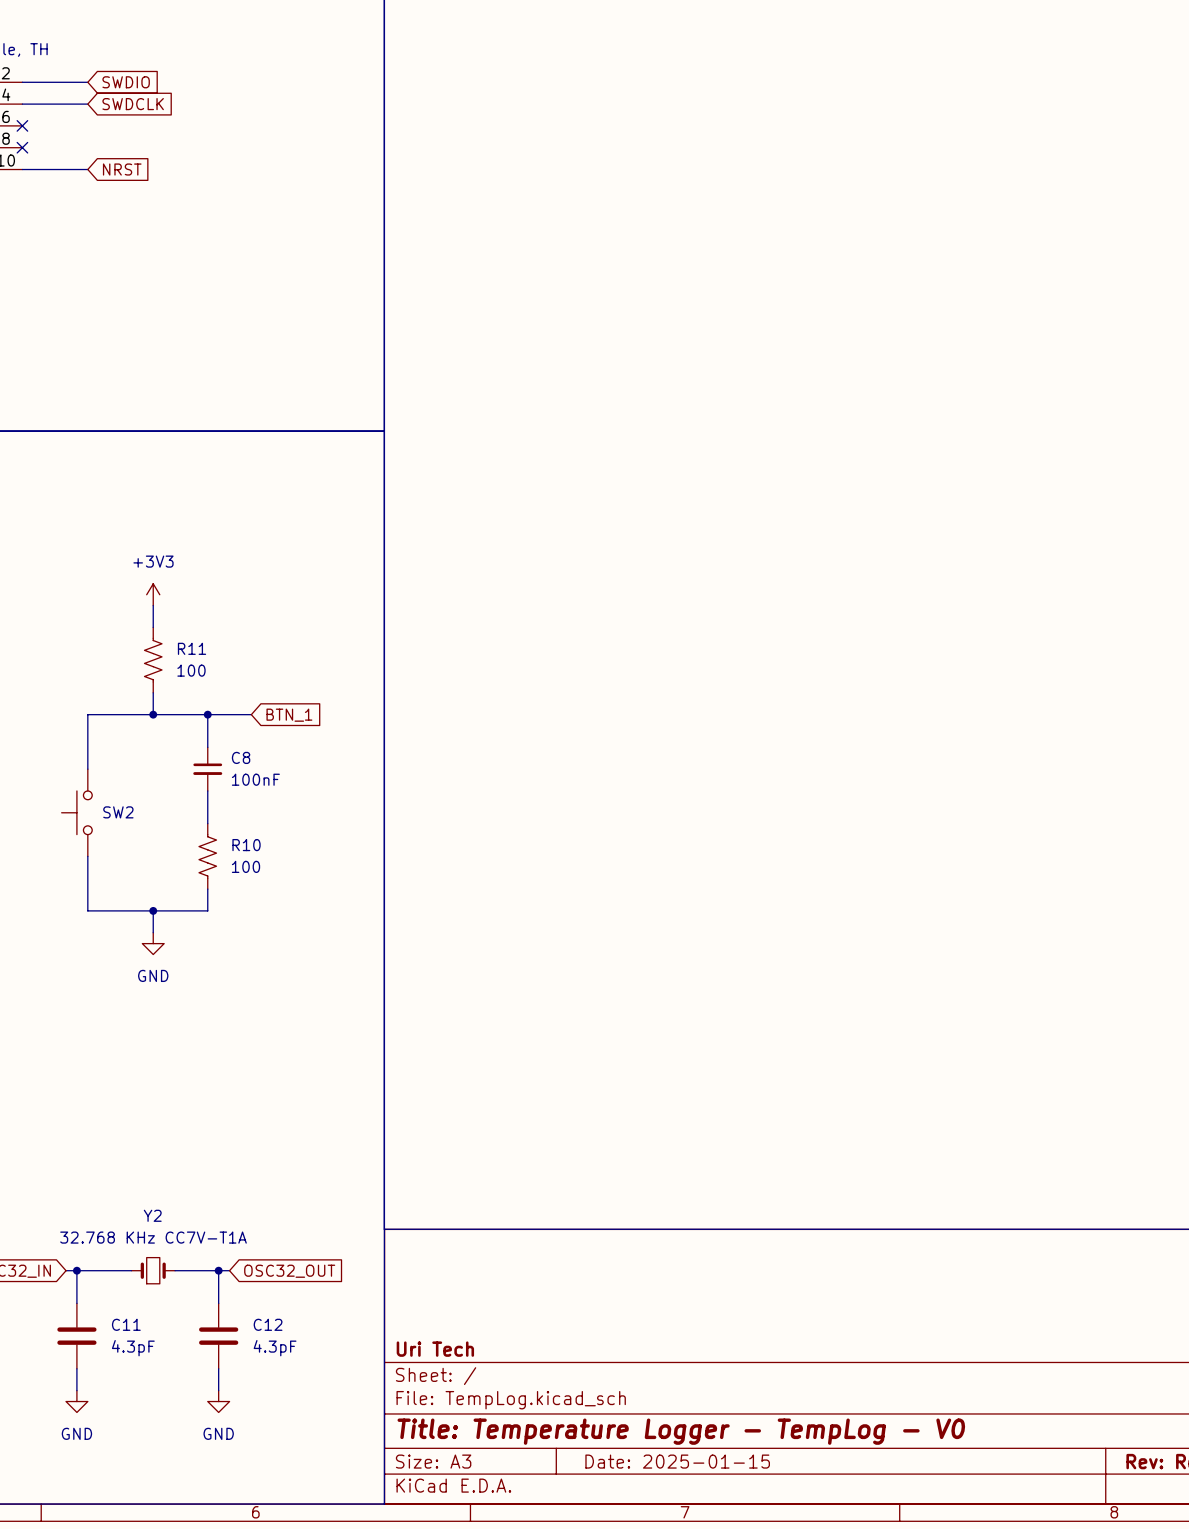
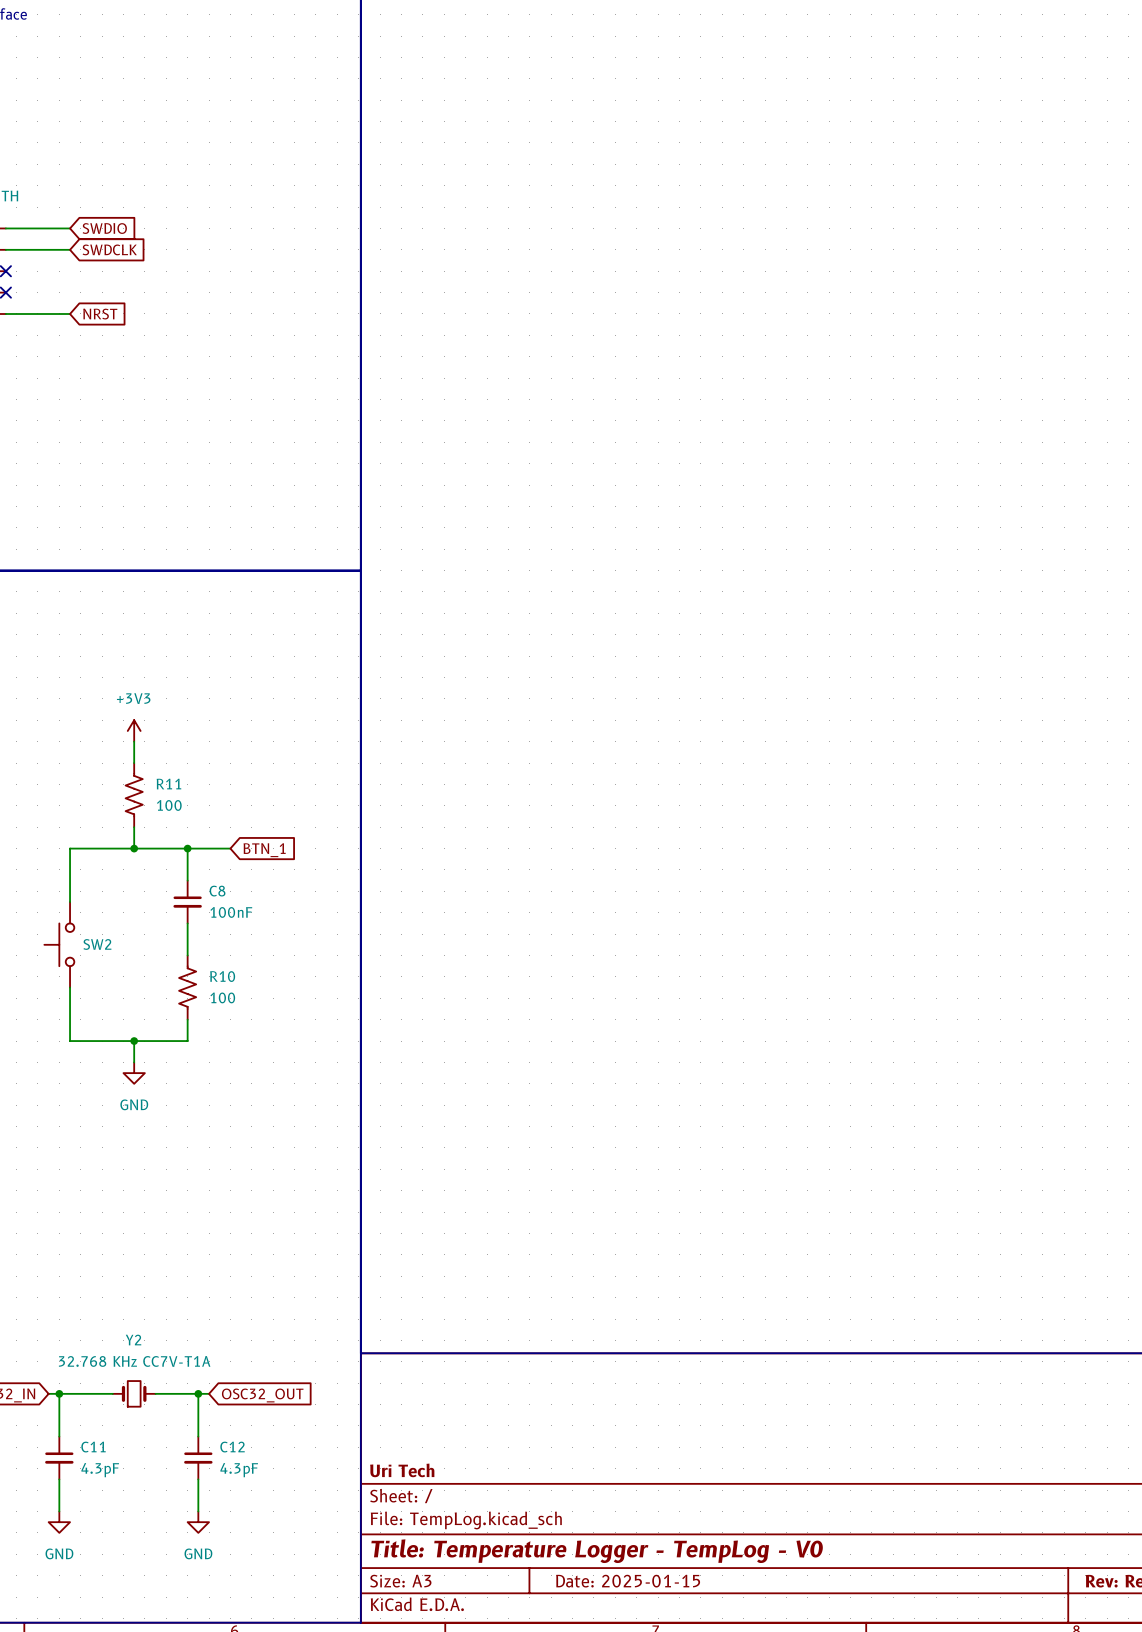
C11 symbol: [57, 1303, 97, 1369] -> [45, 1436, 74, 1480]
C12 symbol: [199, 1303, 239, 1369] -> [184, 1436, 213, 1480]

